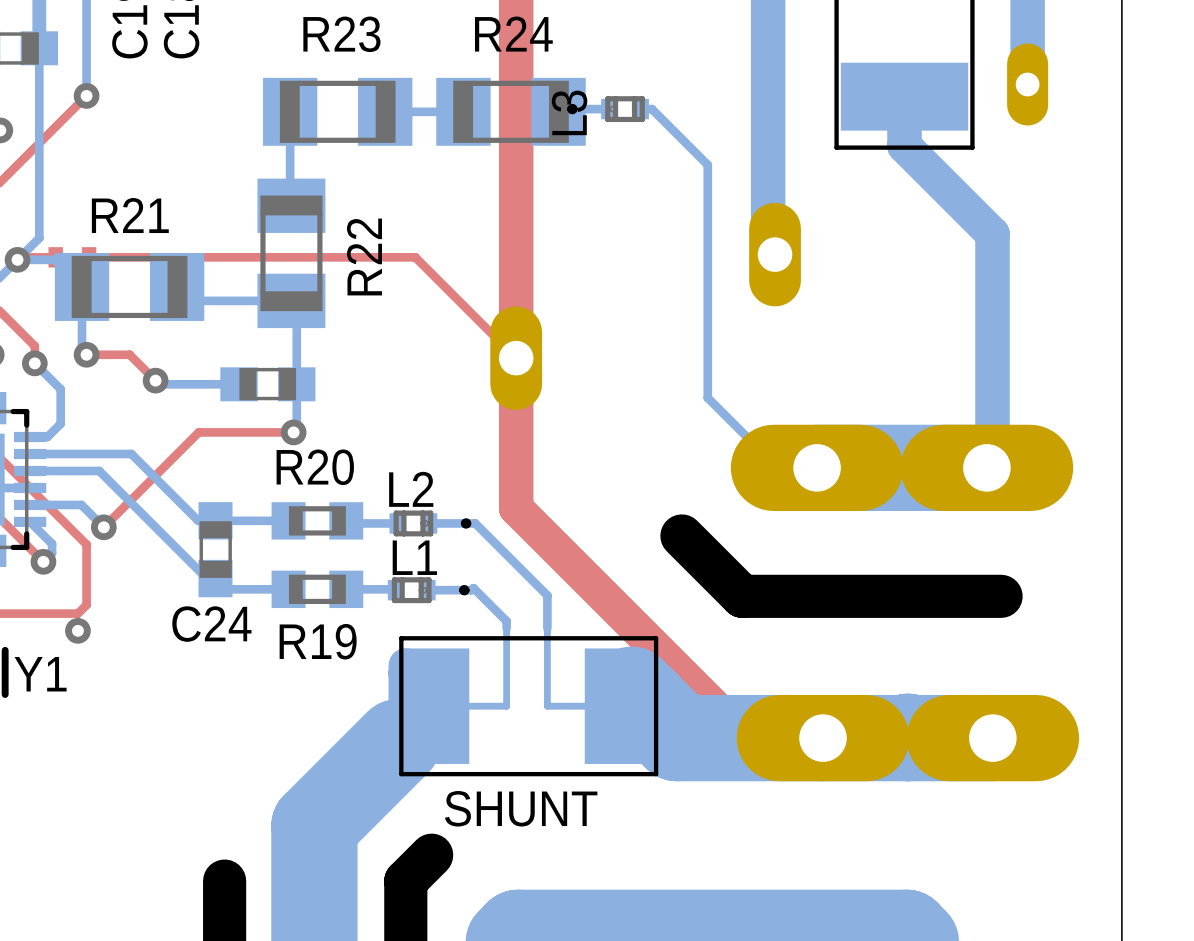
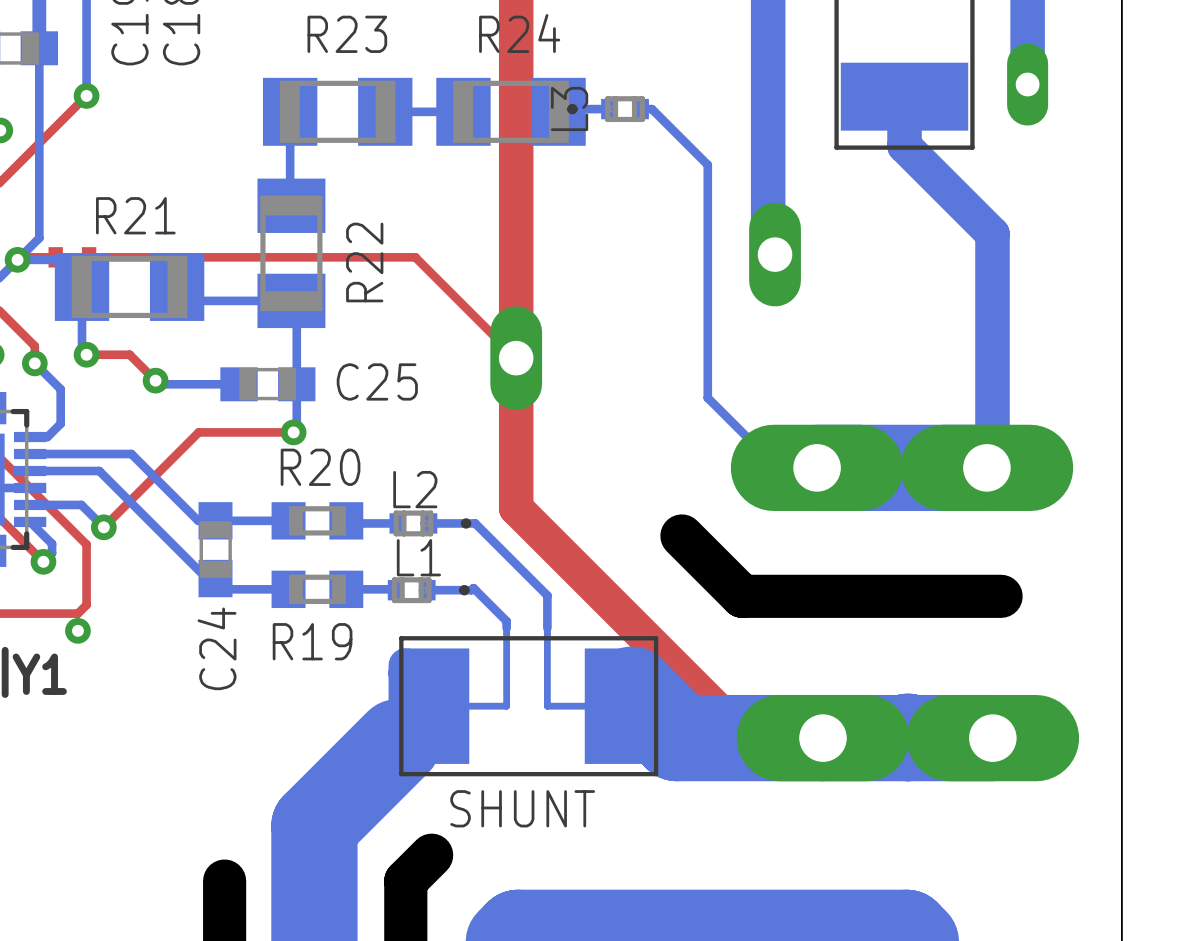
C25 name: none -> C25 (377, 381)
C24 name rotation: 0° (211, 624) -> 90° counterclockwise (217, 648)

